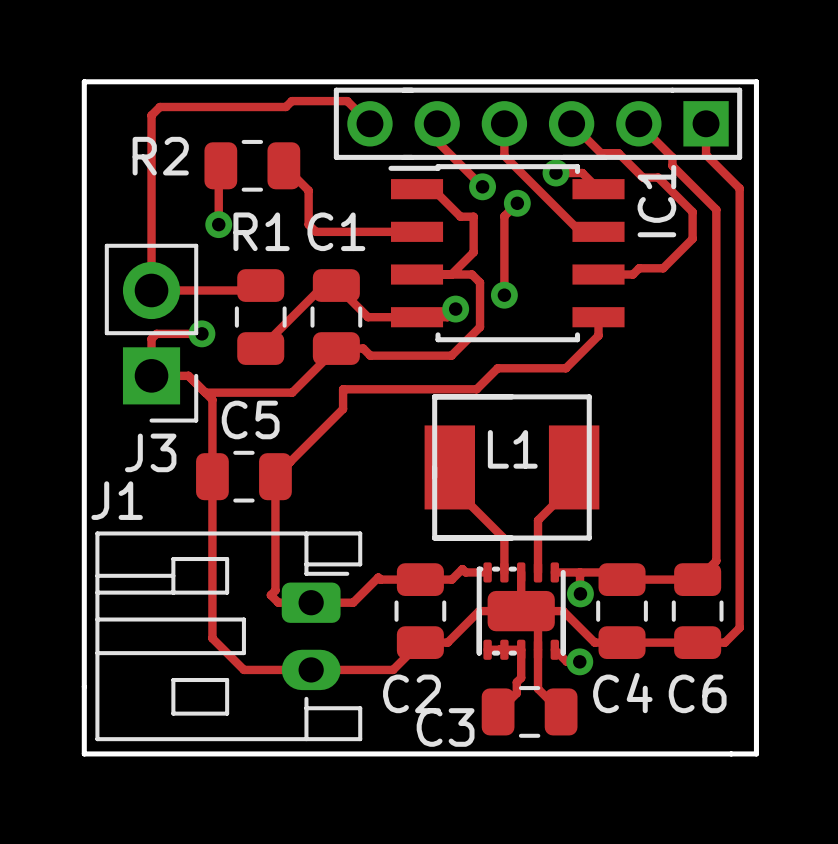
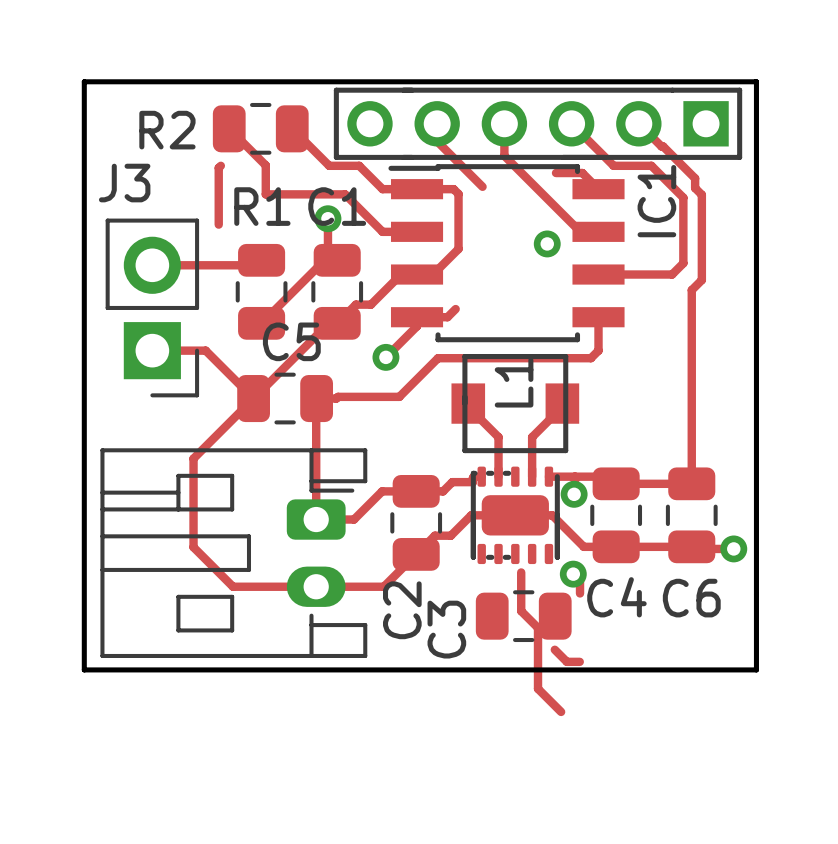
track: (369, 123) (347, 101) (291, 101) (285, 106) (159, 106) (151, 115) (151, 290) (255, 290) (260, 285) -> none
track: (706, 123) (706, 154) (739, 188) (739, 627) (724, 642) (594, 642) (563, 611) (479, 611) (447, 642) (420, 642) (393, 669) (243, 669) (212, 638) (212, 399) (188, 375) (151, 375) (151, 338) (156, 333) (201, 333) -> none
track: none -> (292, 128) (329, 165) (359, 165) (382, 189) (417, 189)
track: (661, 146) (672, 157) (672, 165) (716, 209) (716, 560) (697, 579) (622, 579) (614, 572) (554, 572) -> (661, 146) (695, 178) (695, 188) (701, 194) (701, 280) (691, 290) (691, 483) (616, 483) (609, 476) (548, 476)
track: (601, 153) (618, 153) (642, 177) (658, 177) (692, 212) (692, 238) (663, 268) (639, 268) (632, 274) -> (601, 153) (613, 165) (651, 165) (683, 197) (683, 263) (672, 274) (632, 274)
R2 name position: R2 (160, 156) -> R2 (167, 130)
R2 position: (252, 165) -> (260, 128)
track: (283, 165) (308, 190) (308, 224) (315, 231) (382, 231) -> (229, 128) (265, 165) (265, 194) (345, 194) (382, 231)
via: (556, 173) -> none
via: (482, 186) -> none
track: (432, 189) (460, 216) (473, 216) (473, 252) (451, 274) -> (432, 189) (453, 189) (458, 194) (458, 248) (432, 274)
track: (517, 203) (504, 216) (504, 295) -> none
via: (517, 203) -> none
track: none -> (327, 218) (327, 251) (337, 260) (324, 260) (261, 323)
via: none -> (327, 218)
via: (218, 224) -> none
via: none -> (547, 243)
track: none -> (261, 260) (256, 265) (152, 265)
track: none -> (417, 274) (401, 274) (370, 304) (355, 304) (337, 323) (328, 323) (193, 458) (193, 547) (233, 586) (383, 586) (434, 535) (450, 535) (471, 515) (552, 515) (583, 546) (691, 546) (693, 548) (733, 548)
track: (432, 274) (471, 274) (480, 282) (480, 327) (451, 355) (370, 355) (363, 348) (336, 348) (292, 392) (205, 392) -> none
via: (504, 295) -> none
via: (455, 309) -> none
R1 position: (260, 317) -> (261, 291)
C1 position: (336, 317) -> (337, 291)
track: (417, 317) (368, 317) (336, 285) (323, 285) (260, 348) -> (417, 317) (417, 326) (385, 357)
J3 position: (151, 333) -> (152, 307)
via: (201, 333) -> none
track: (598, 335) (565, 368) (497, 368) (476, 389) (343, 389) (343, 409) (275, 476) (275, 590) (270, 595) (278, 602) (353, 602) (378, 577) (380, 579) (451, 579) (462, 569) (465, 572) (487, 572) -> (598, 335) (598, 350) (590, 358) (438, 358) (399, 396) (316, 398)
track: none -> (152, 350) (205, 350) (253, 398)
via: none -> (385, 357)
L1 footprint: [424, 394, 600, 541] -> [451, 354, 580, 454]
track: none -> (316, 398) (316, 519) (354, 519) (382, 491) (443, 491) (452, 482) (472, 482) (474, 476) (481, 476)
track: none -> (468, 403) (468, 406) (498, 437) (498, 476)
track: none -> (562, 403) (562, 406) (532, 437) (532, 476)
J3 name position: J3 (150, 452) -> J3 (124, 183)
track: (449, 467) (449, 484) (504, 538) (504, 572) -> none
track: (574, 467) (574, 484) (538, 520) (538, 572) -> none
C5 position: (243, 476) -> (285, 398)
via: none -> (574, 494)
via: none -> (733, 548)
part: none -> (233, 553)
via position: (580, 593) -> (573, 574)
C2 position: (420, 611) -> (416, 522)
part position: (521, 611) -> (515, 515)
C4 position: (622, 611) -> (616, 515)
C6 position: (697, 611) -> (691, 515)
J1: (228, 636) -> none
track: (487, 649) (521, 649) (521, 677) (516, 682) (516, 693) (498, 711) -> none
via: (579, 661) -> none
board edge: (84, 669) (84, 753) (756, 753) (756, 669) -> (84, 669) (756, 669)
C2 name rotation: 0° (411, 693) -> 90° counterclockwise (402, 610)
C3 position: (529, 711) -> (523, 616)
C3 name rotation: 0° (445, 727) -> 90° counterclockwise (446, 629)

